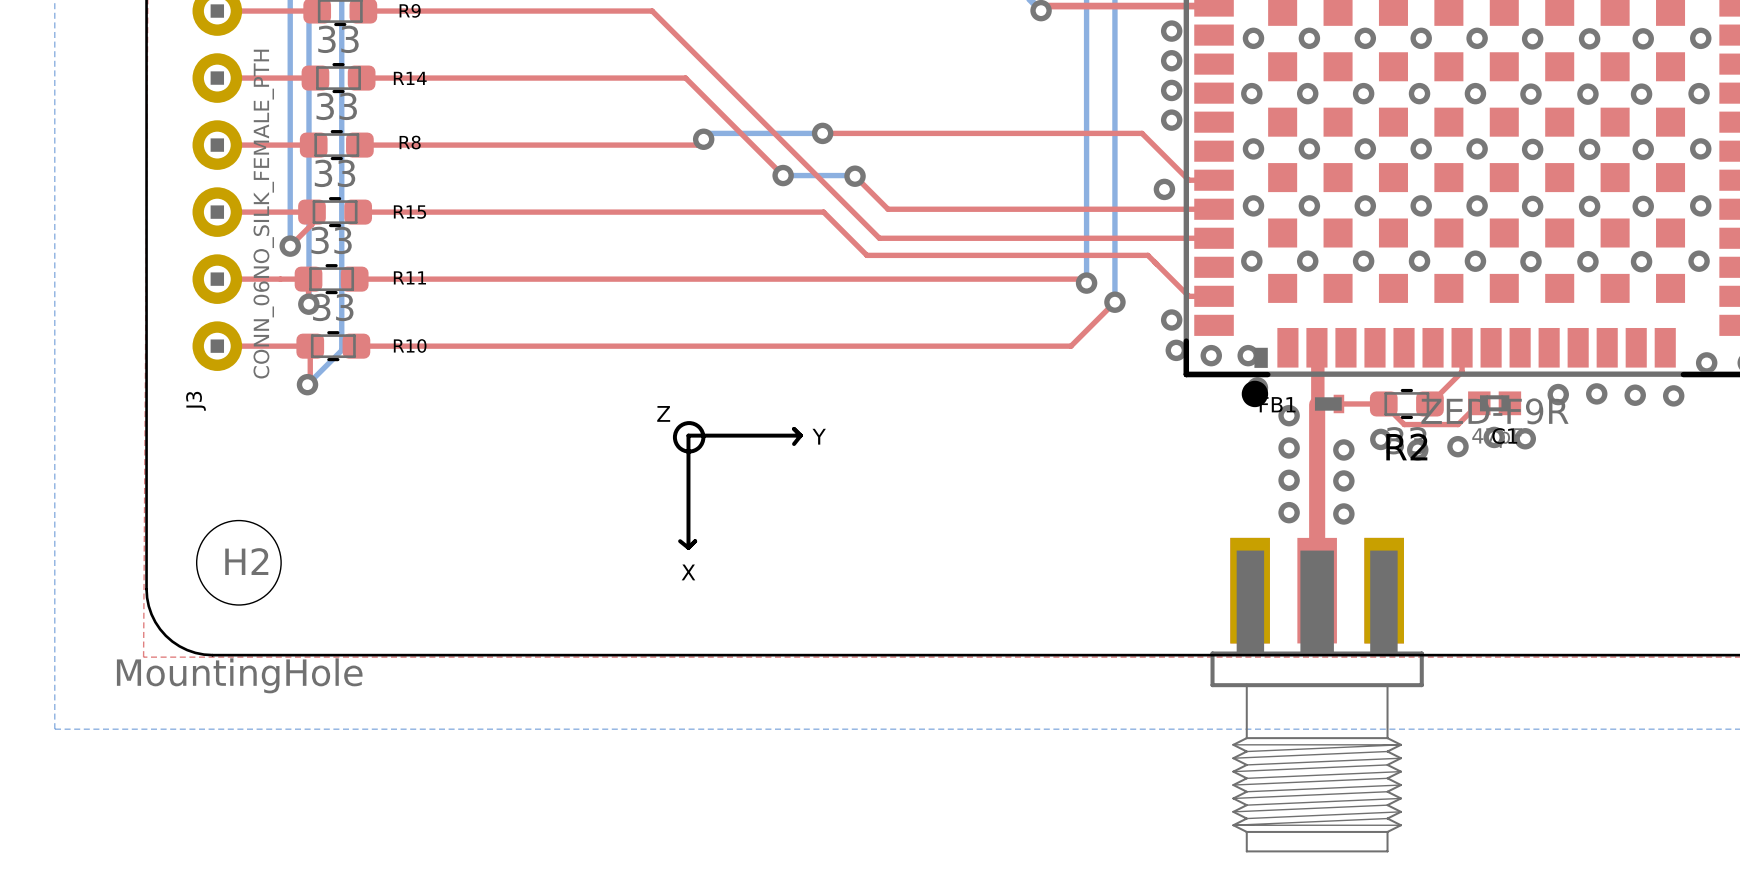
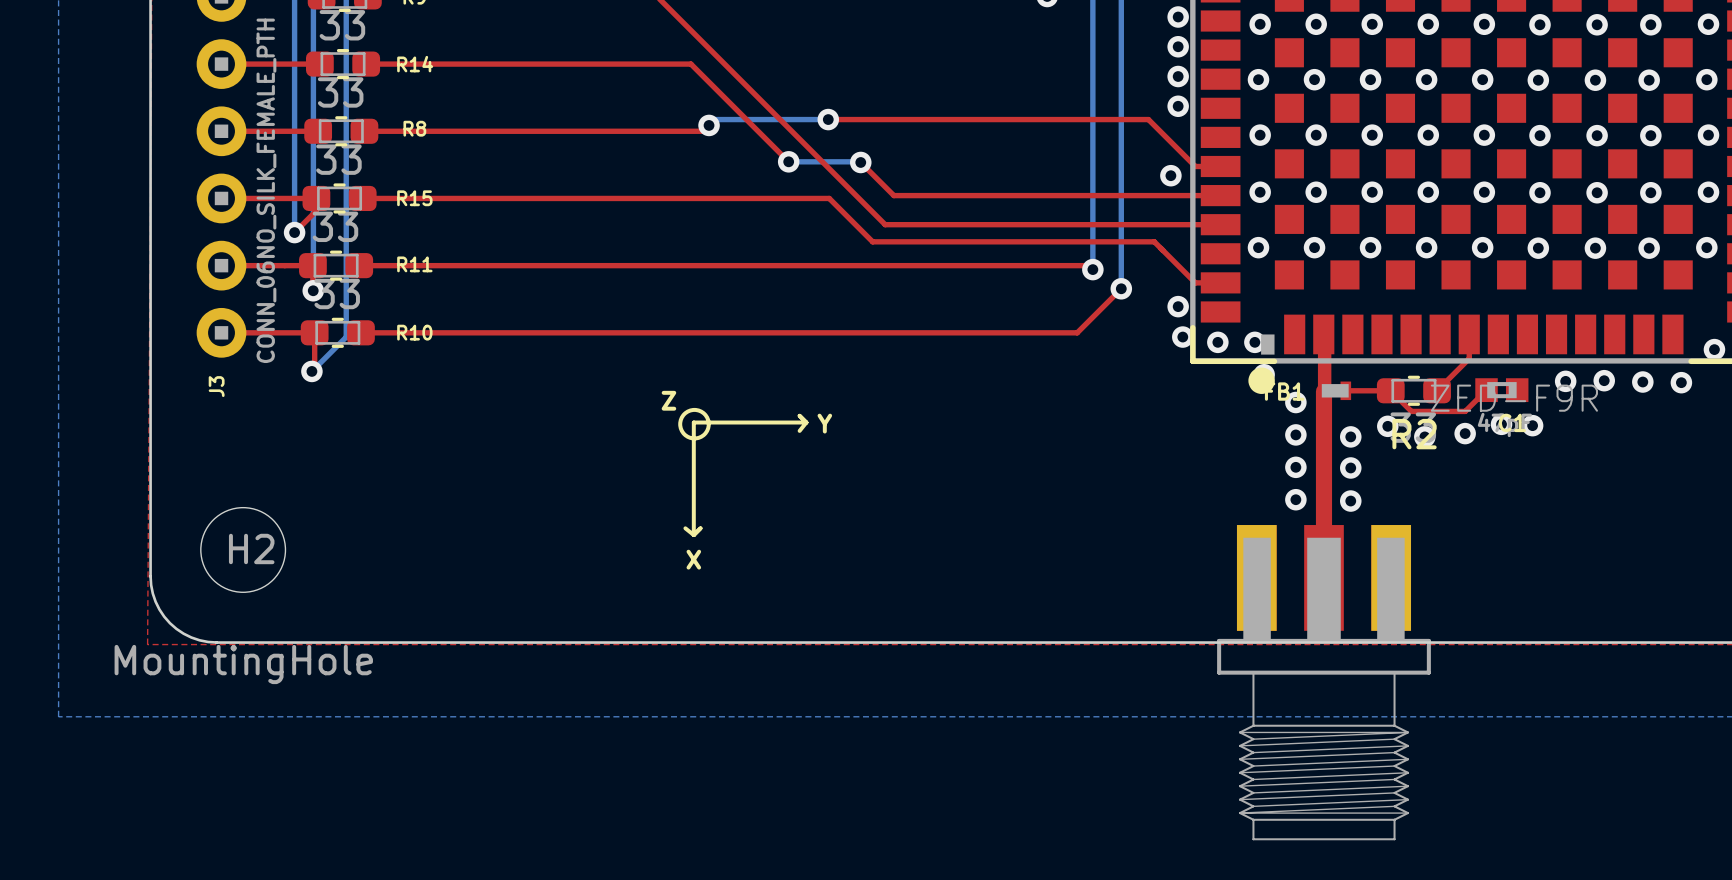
J3 name position: J3 (195, 401) -> J3 (216, 386)

